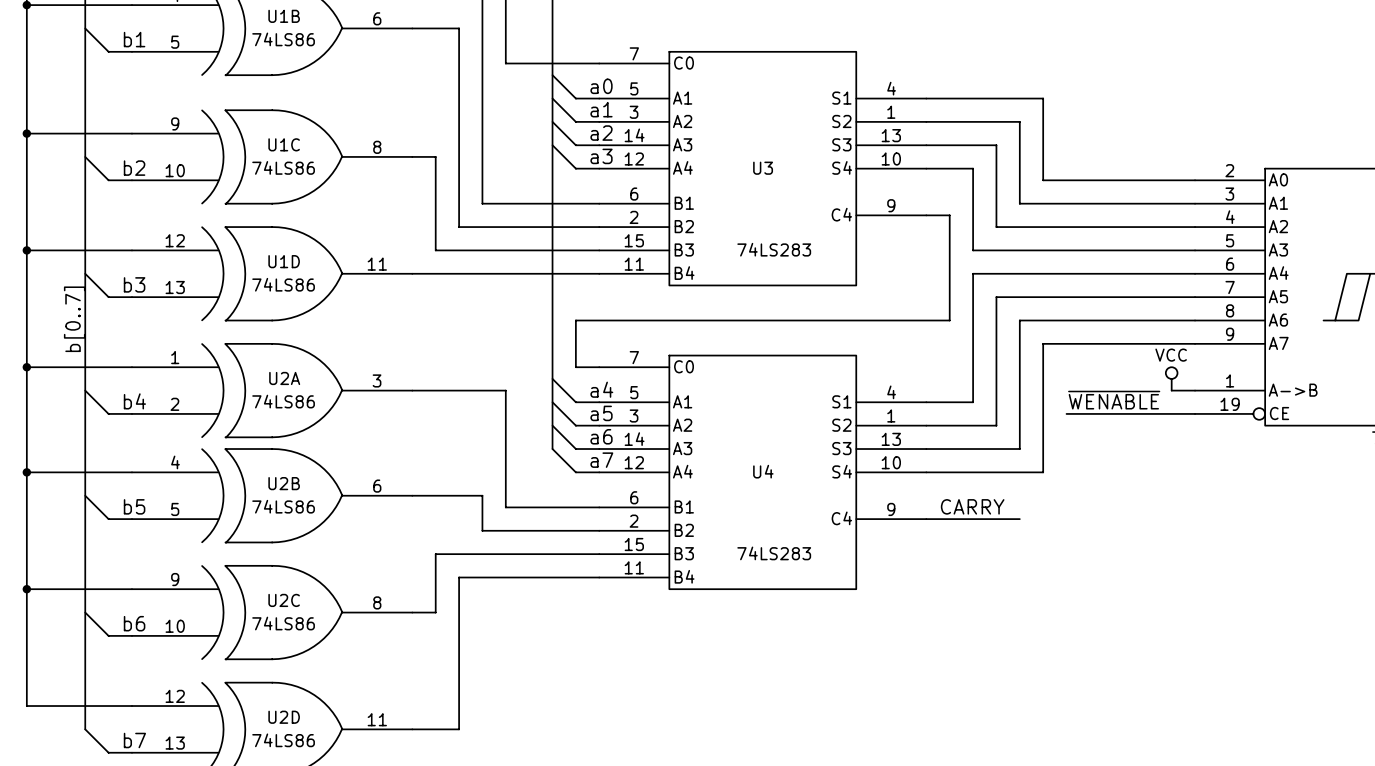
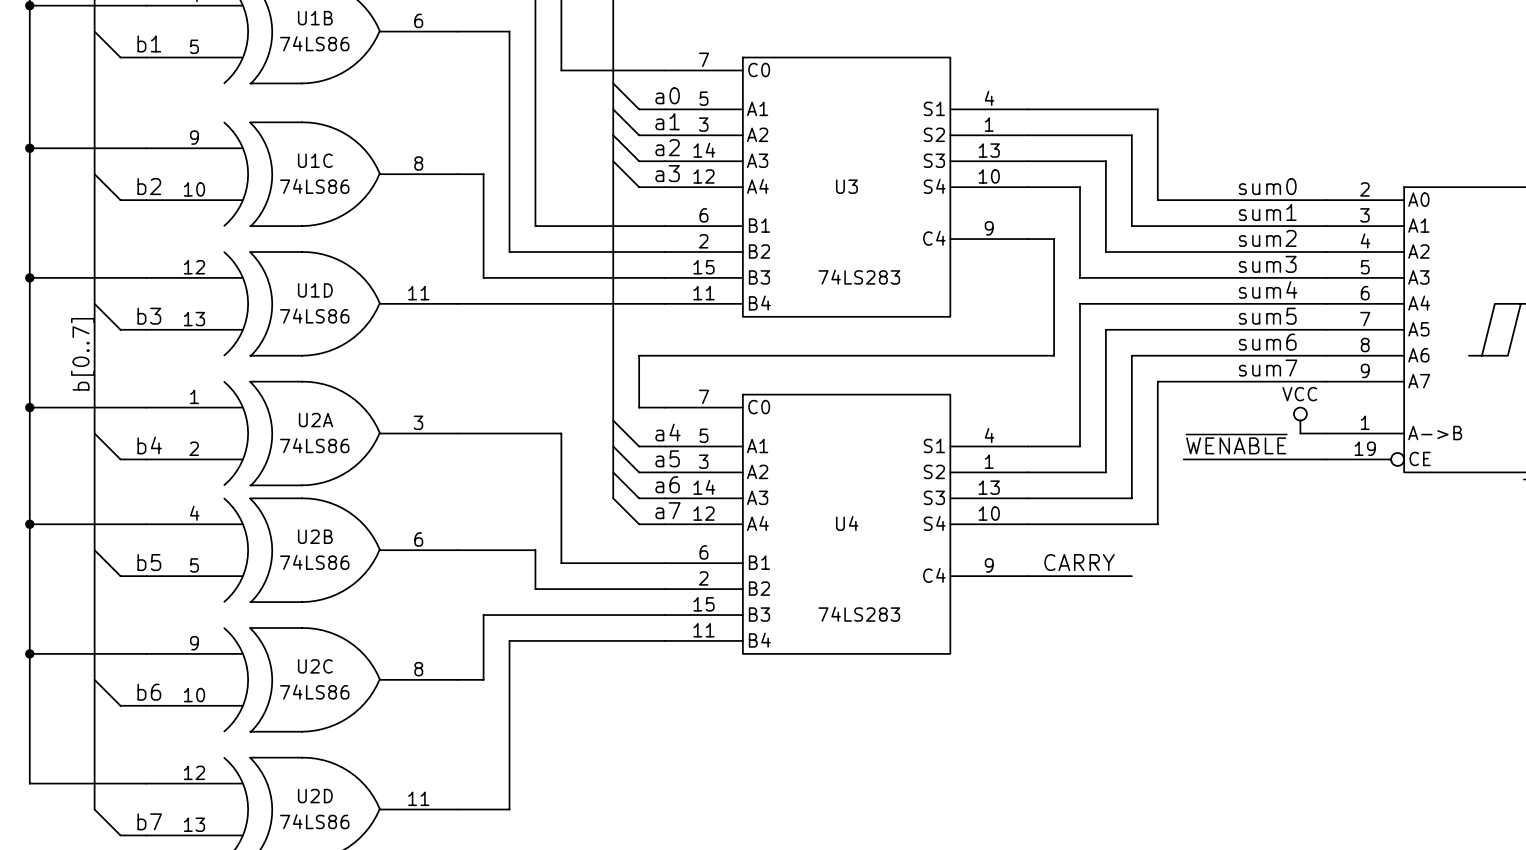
label: none -> sum0 (1267, 186)
label: none -> sum1 (1267, 212)
label: none -> sum2 (1267, 238)
label: none -> sum3 (1267, 264)
label: none -> sum4 (1268, 289)
label: none -> sum5 (1267, 316)
label: none -> sum6 (1267, 342)
label: none -> sum7 (1268, 368)

